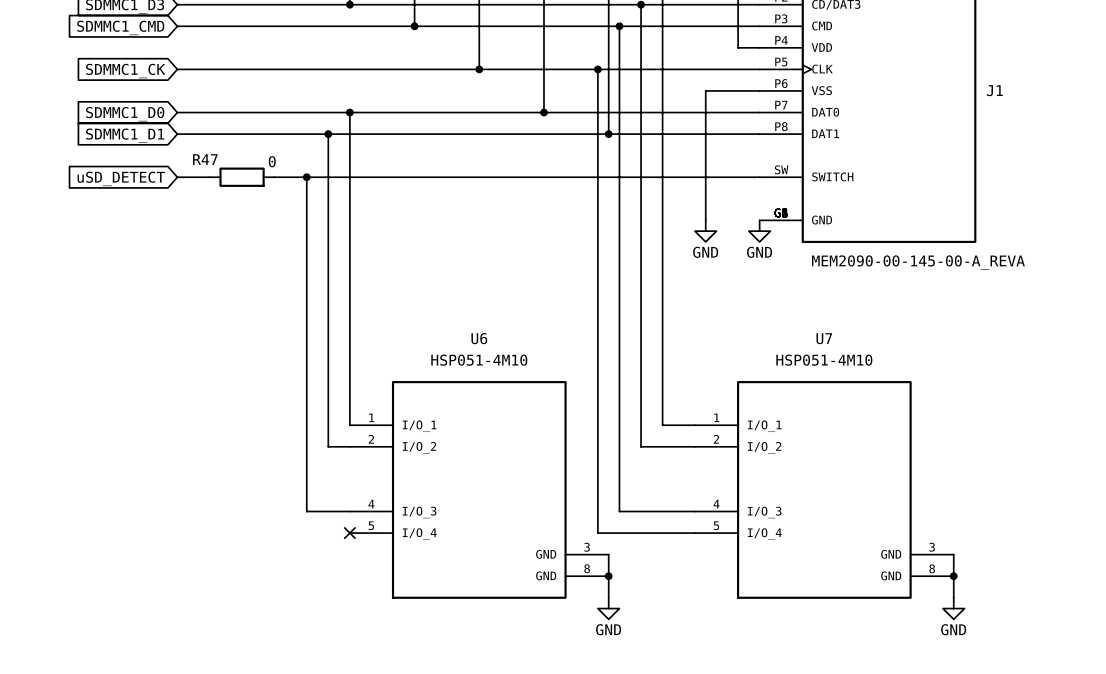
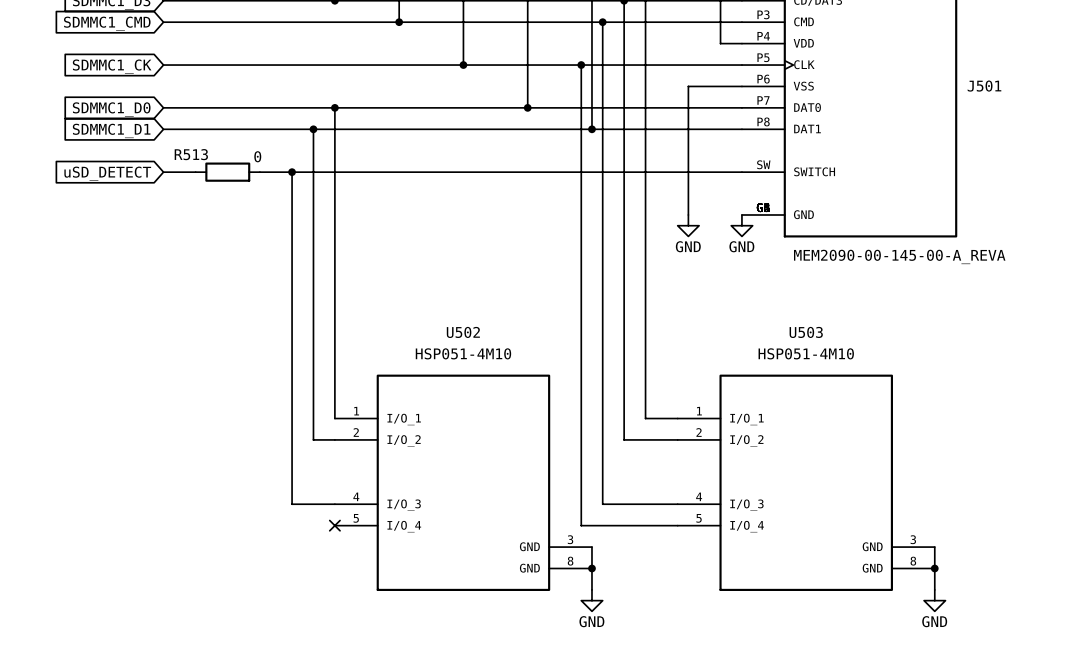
J1 name: J1 (994, 90) -> J501 (984, 86)
R47 name: R47 (205, 159) -> R513 (191, 154)
U6 name: U6 (479, 338) -> U502 (463, 332)
U7 name: U7 (824, 338) -> U503 (806, 332)

